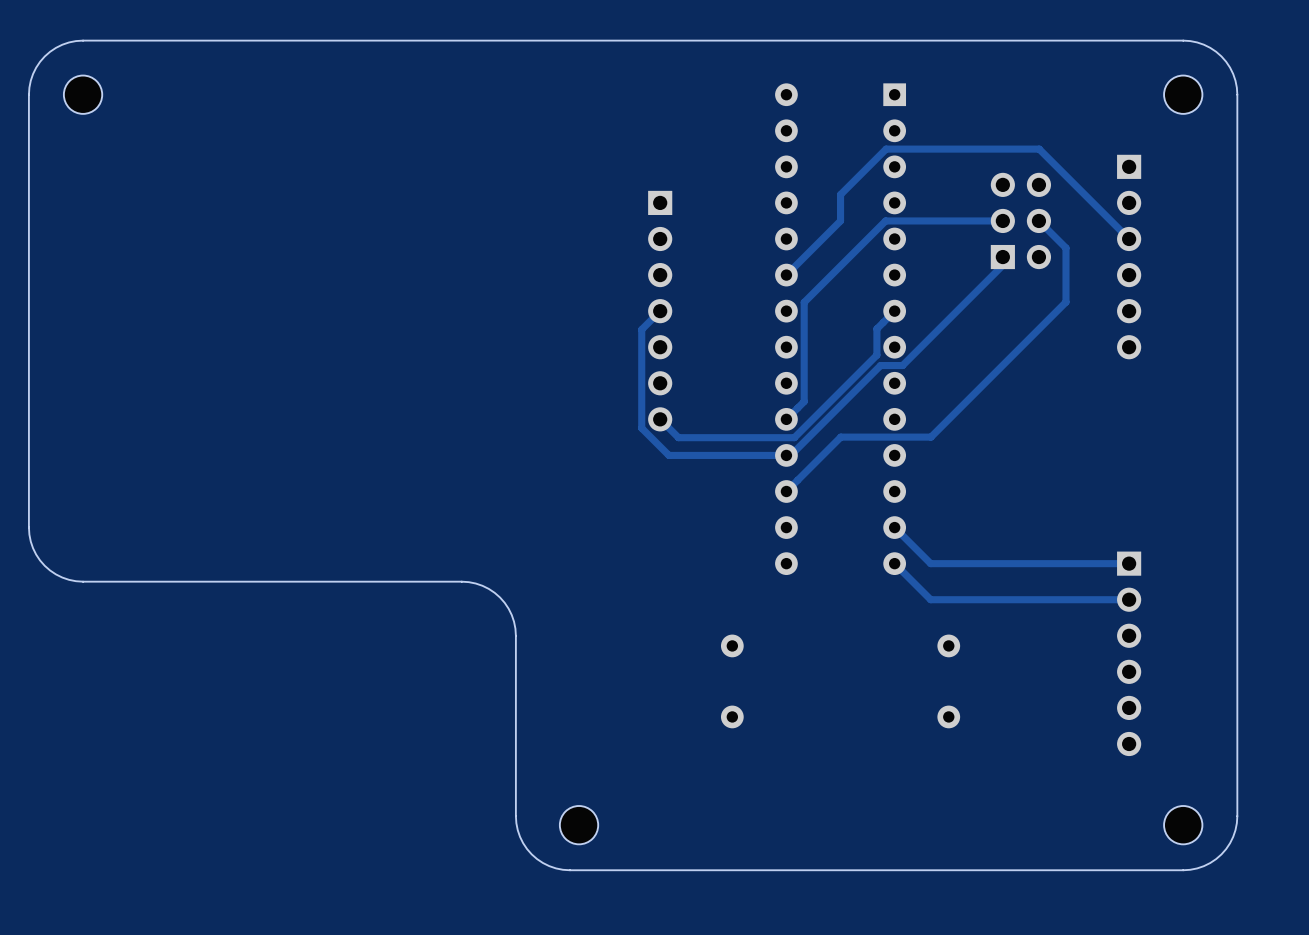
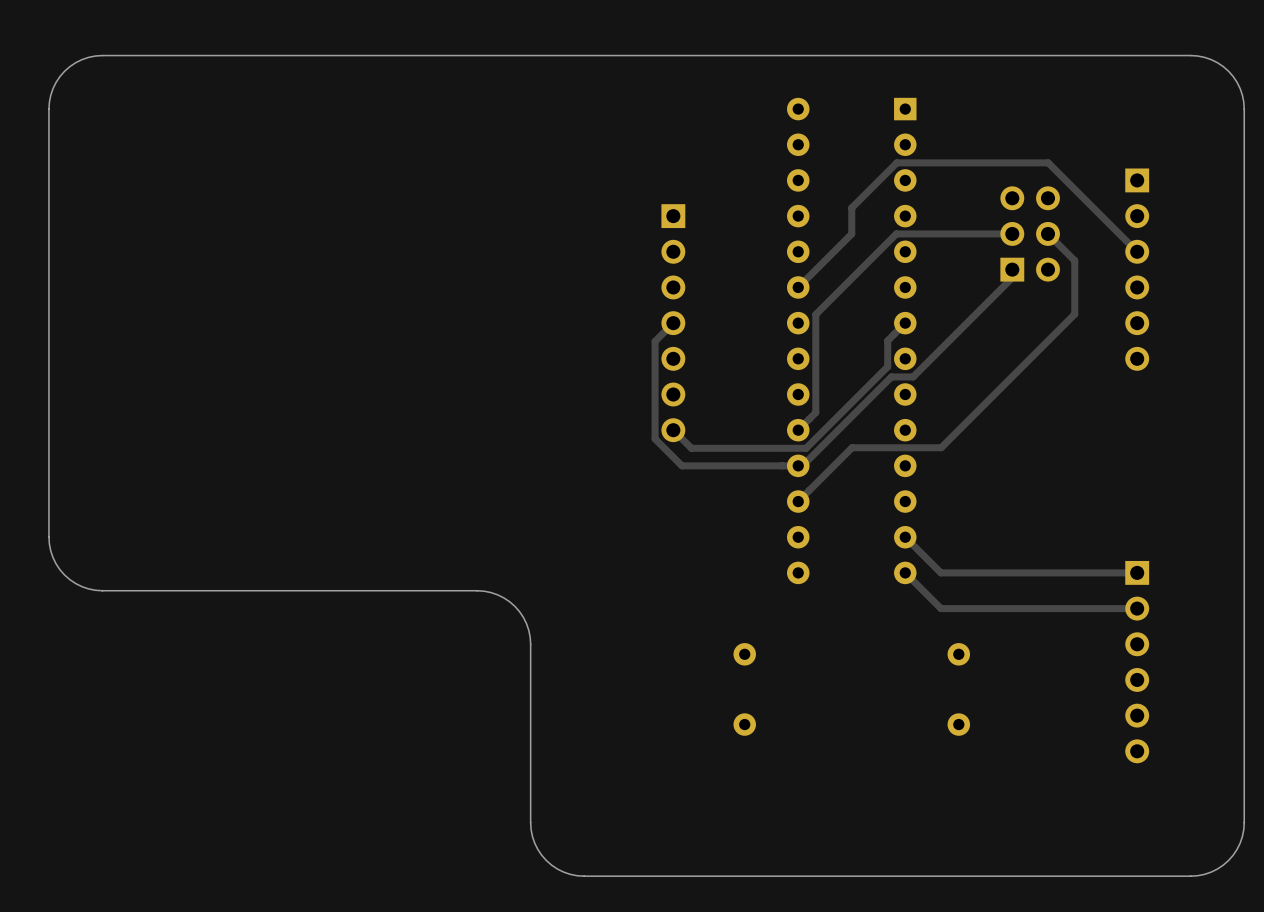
part: (83, 94) -> none
part: (1183, 94) -> none
part: (579, 825) -> none
part: (1183, 825) -> none

